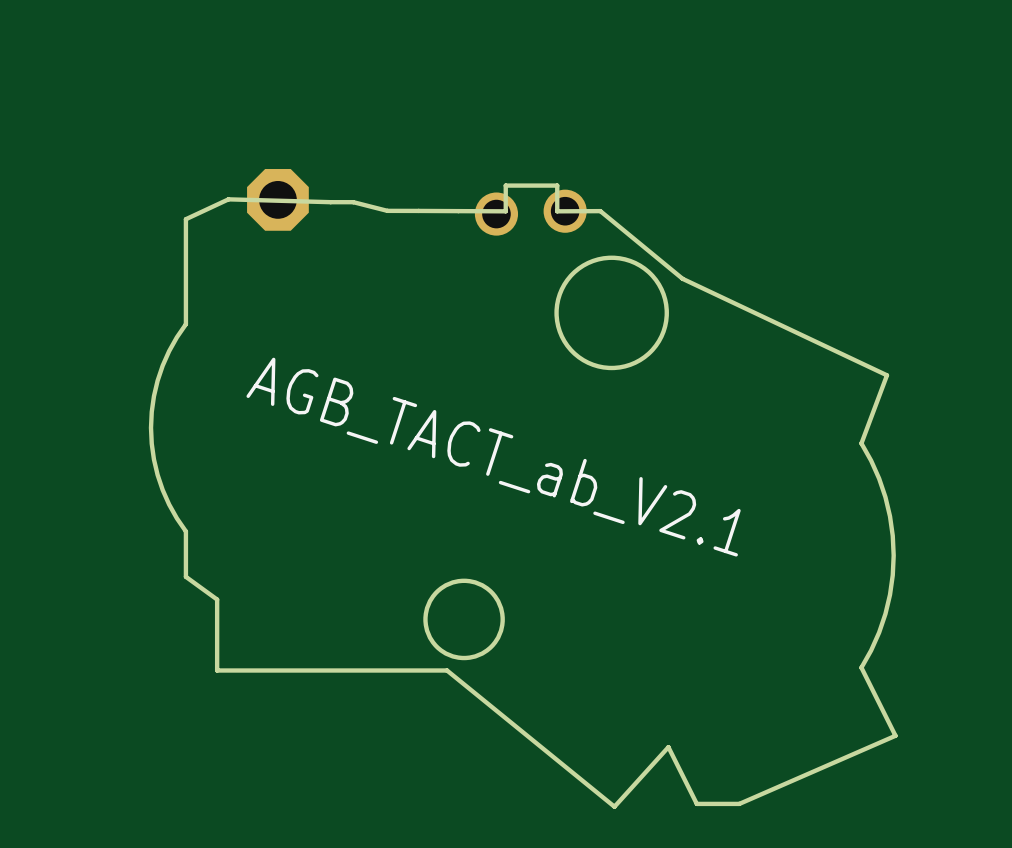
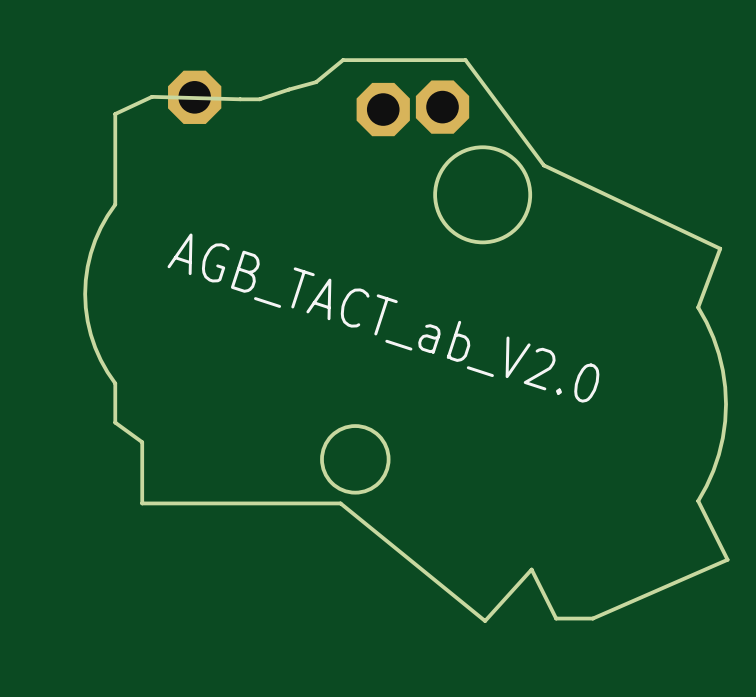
part footprint: [543, 189, 587, 233] -> [415, 80, 470, 134]
part footprint: [474, 192, 519, 236] -> [356, 82, 410, 137]
board edge: (353, 202) (387, 210) (505, 211) (505, 185) (557, 185) (557, 211) (600, 211) (682, 278) -> (259, 99) (316, 82) (343, 60) (465, 60) (543, 165)
text: AGB_TACT_ab_V2.1 (493, 457) -> AGB_TACT_ab_V2.0 (383, 318)

